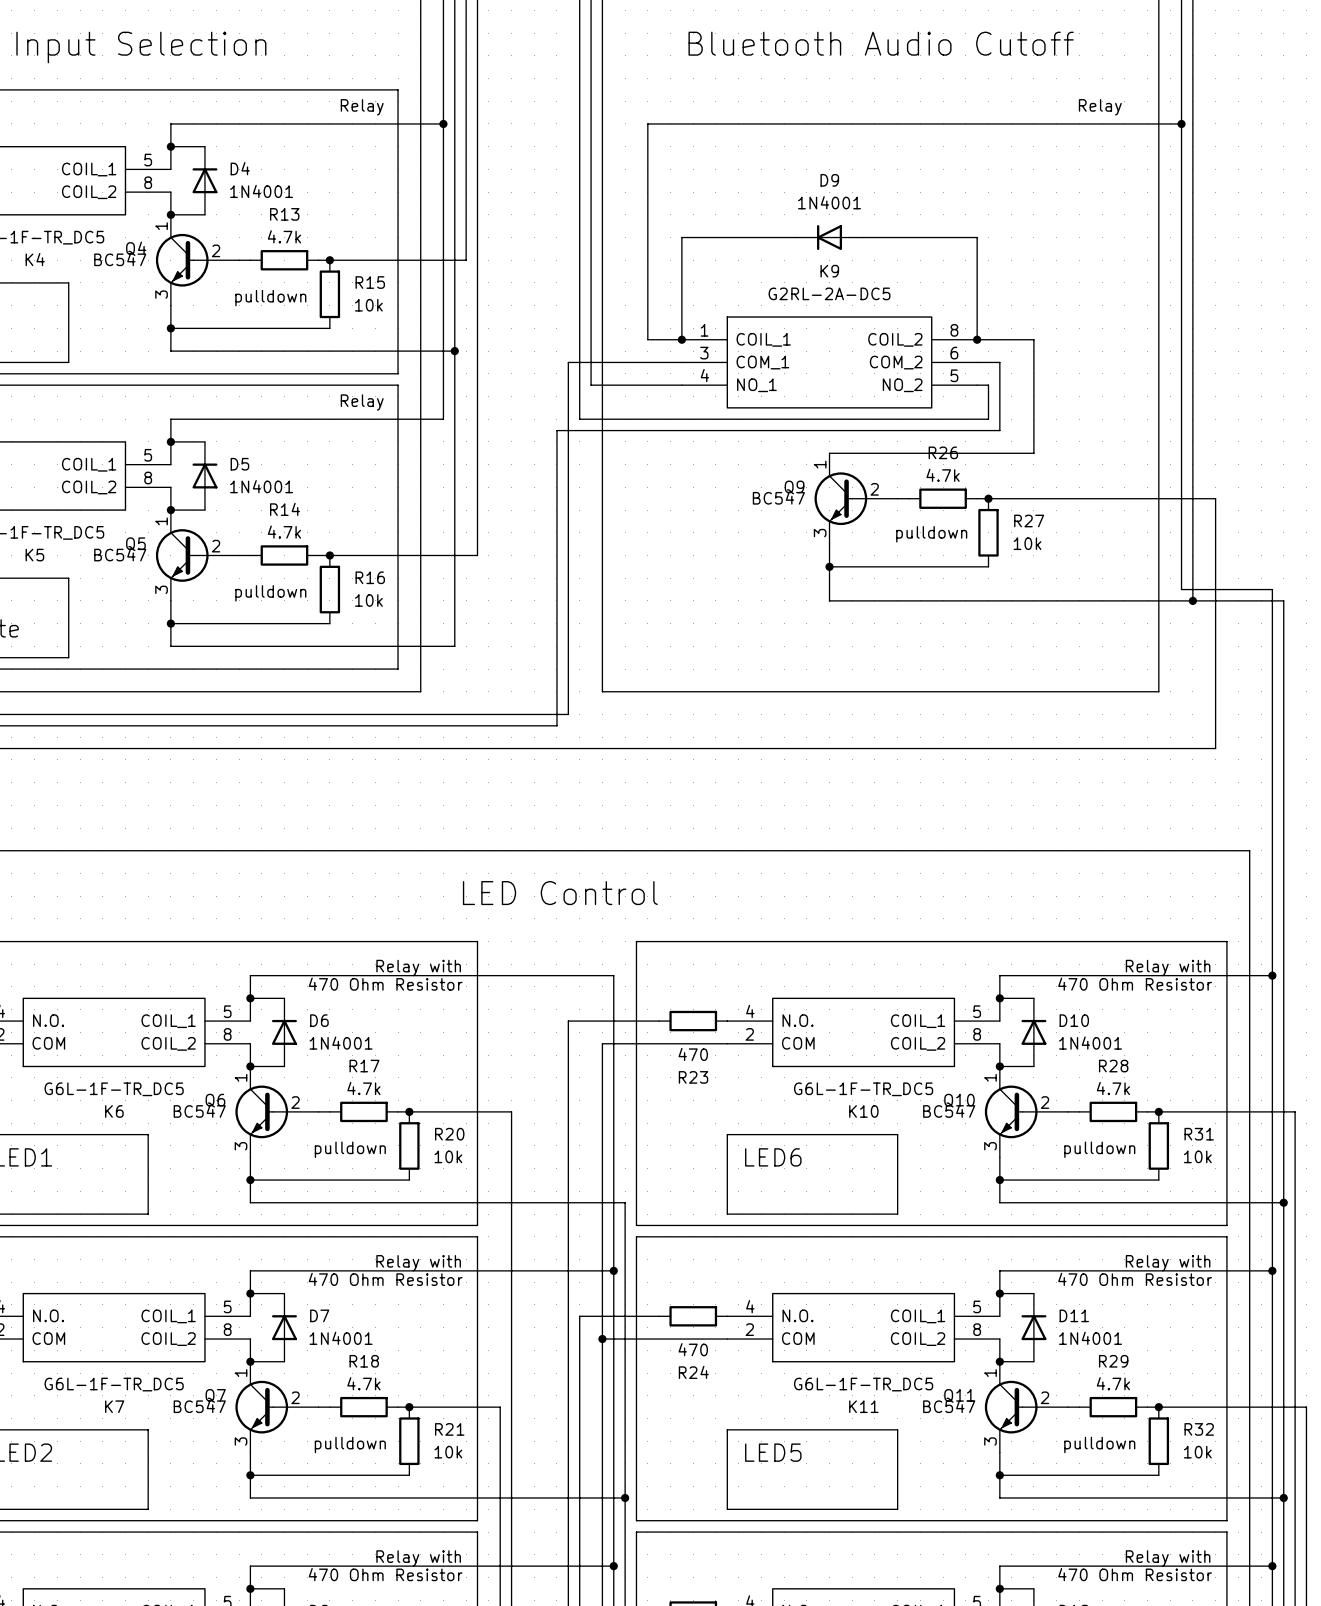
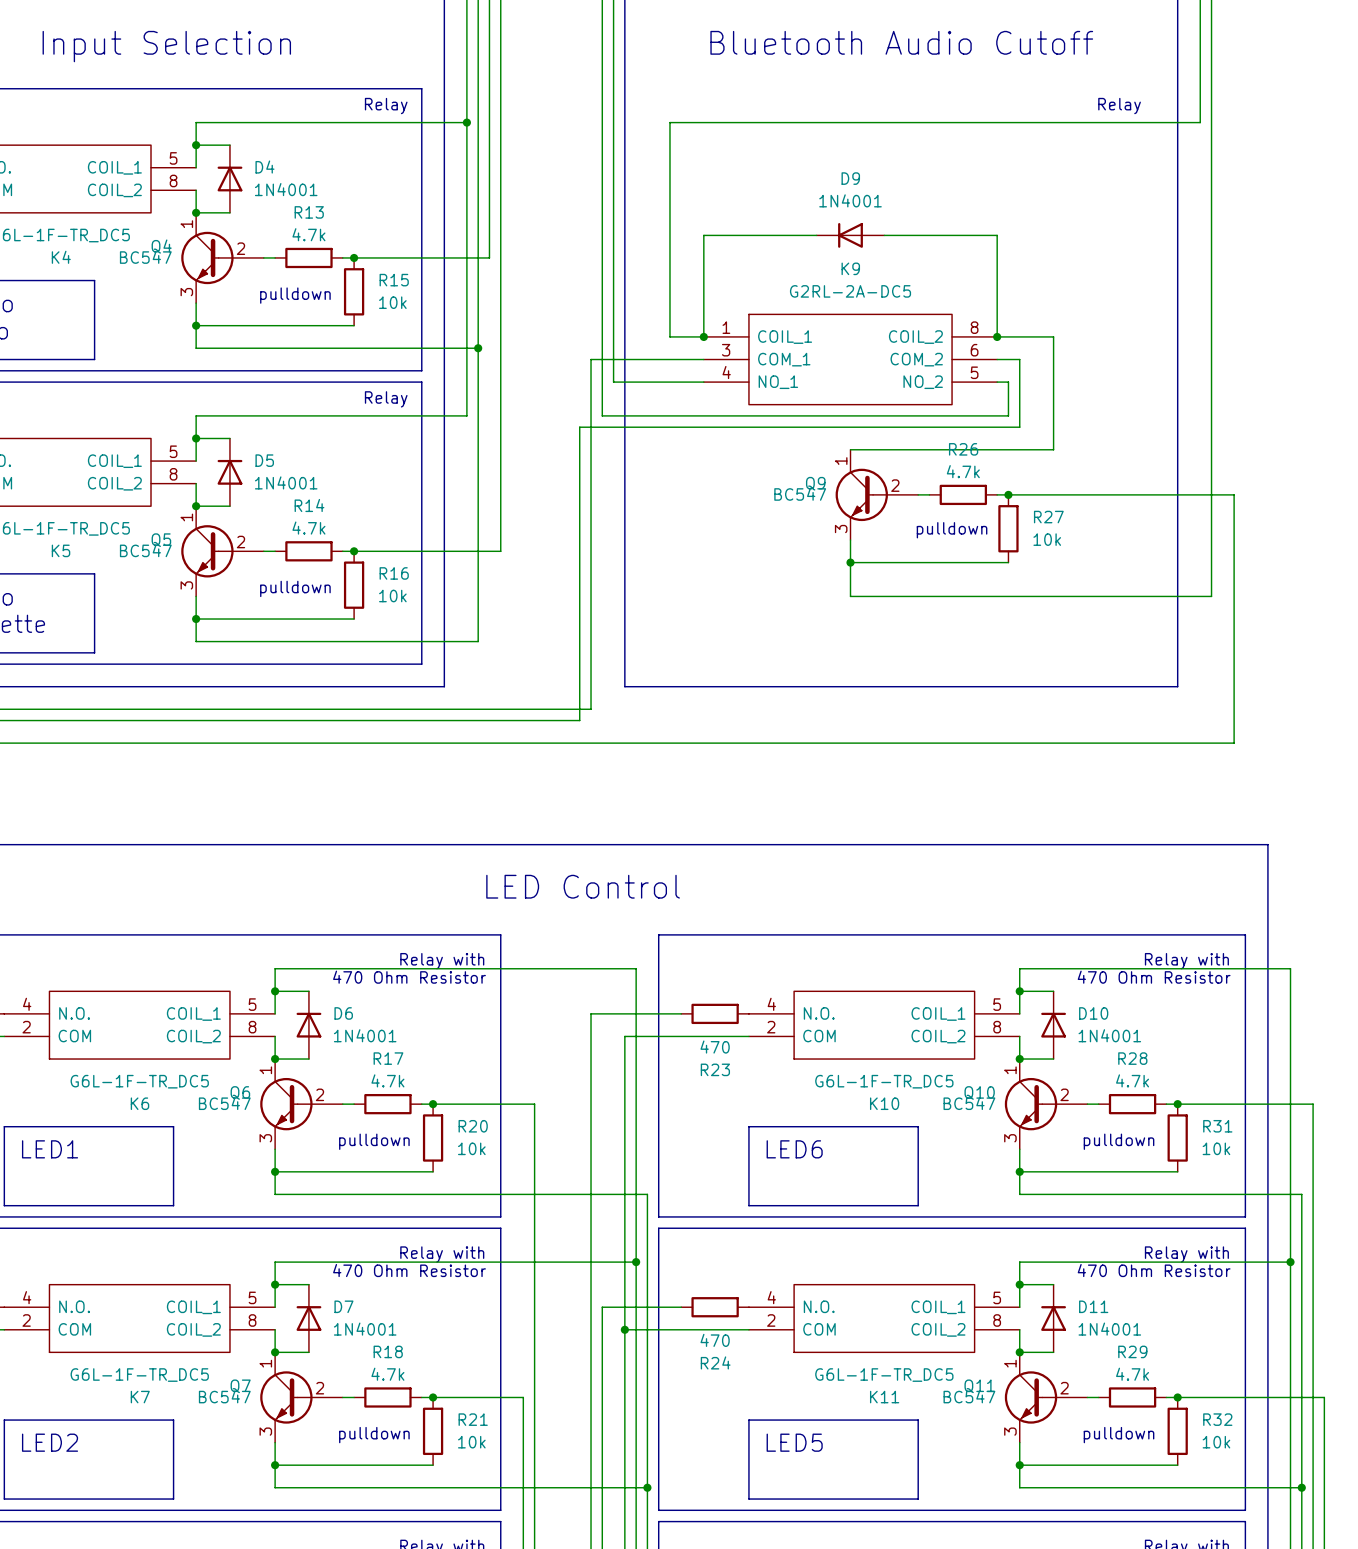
wire: (1181, 123) (1181, 589) (1272, 589) (1272, 975) -> none
junction: (1181, 123) -> none
wire: (1192, 600) (1283, 600) (1283, 1202) -> none
junction: (1192, 600) -> none
junction: (1272, 975) -> none
junction: (1283, 1202) -> none

